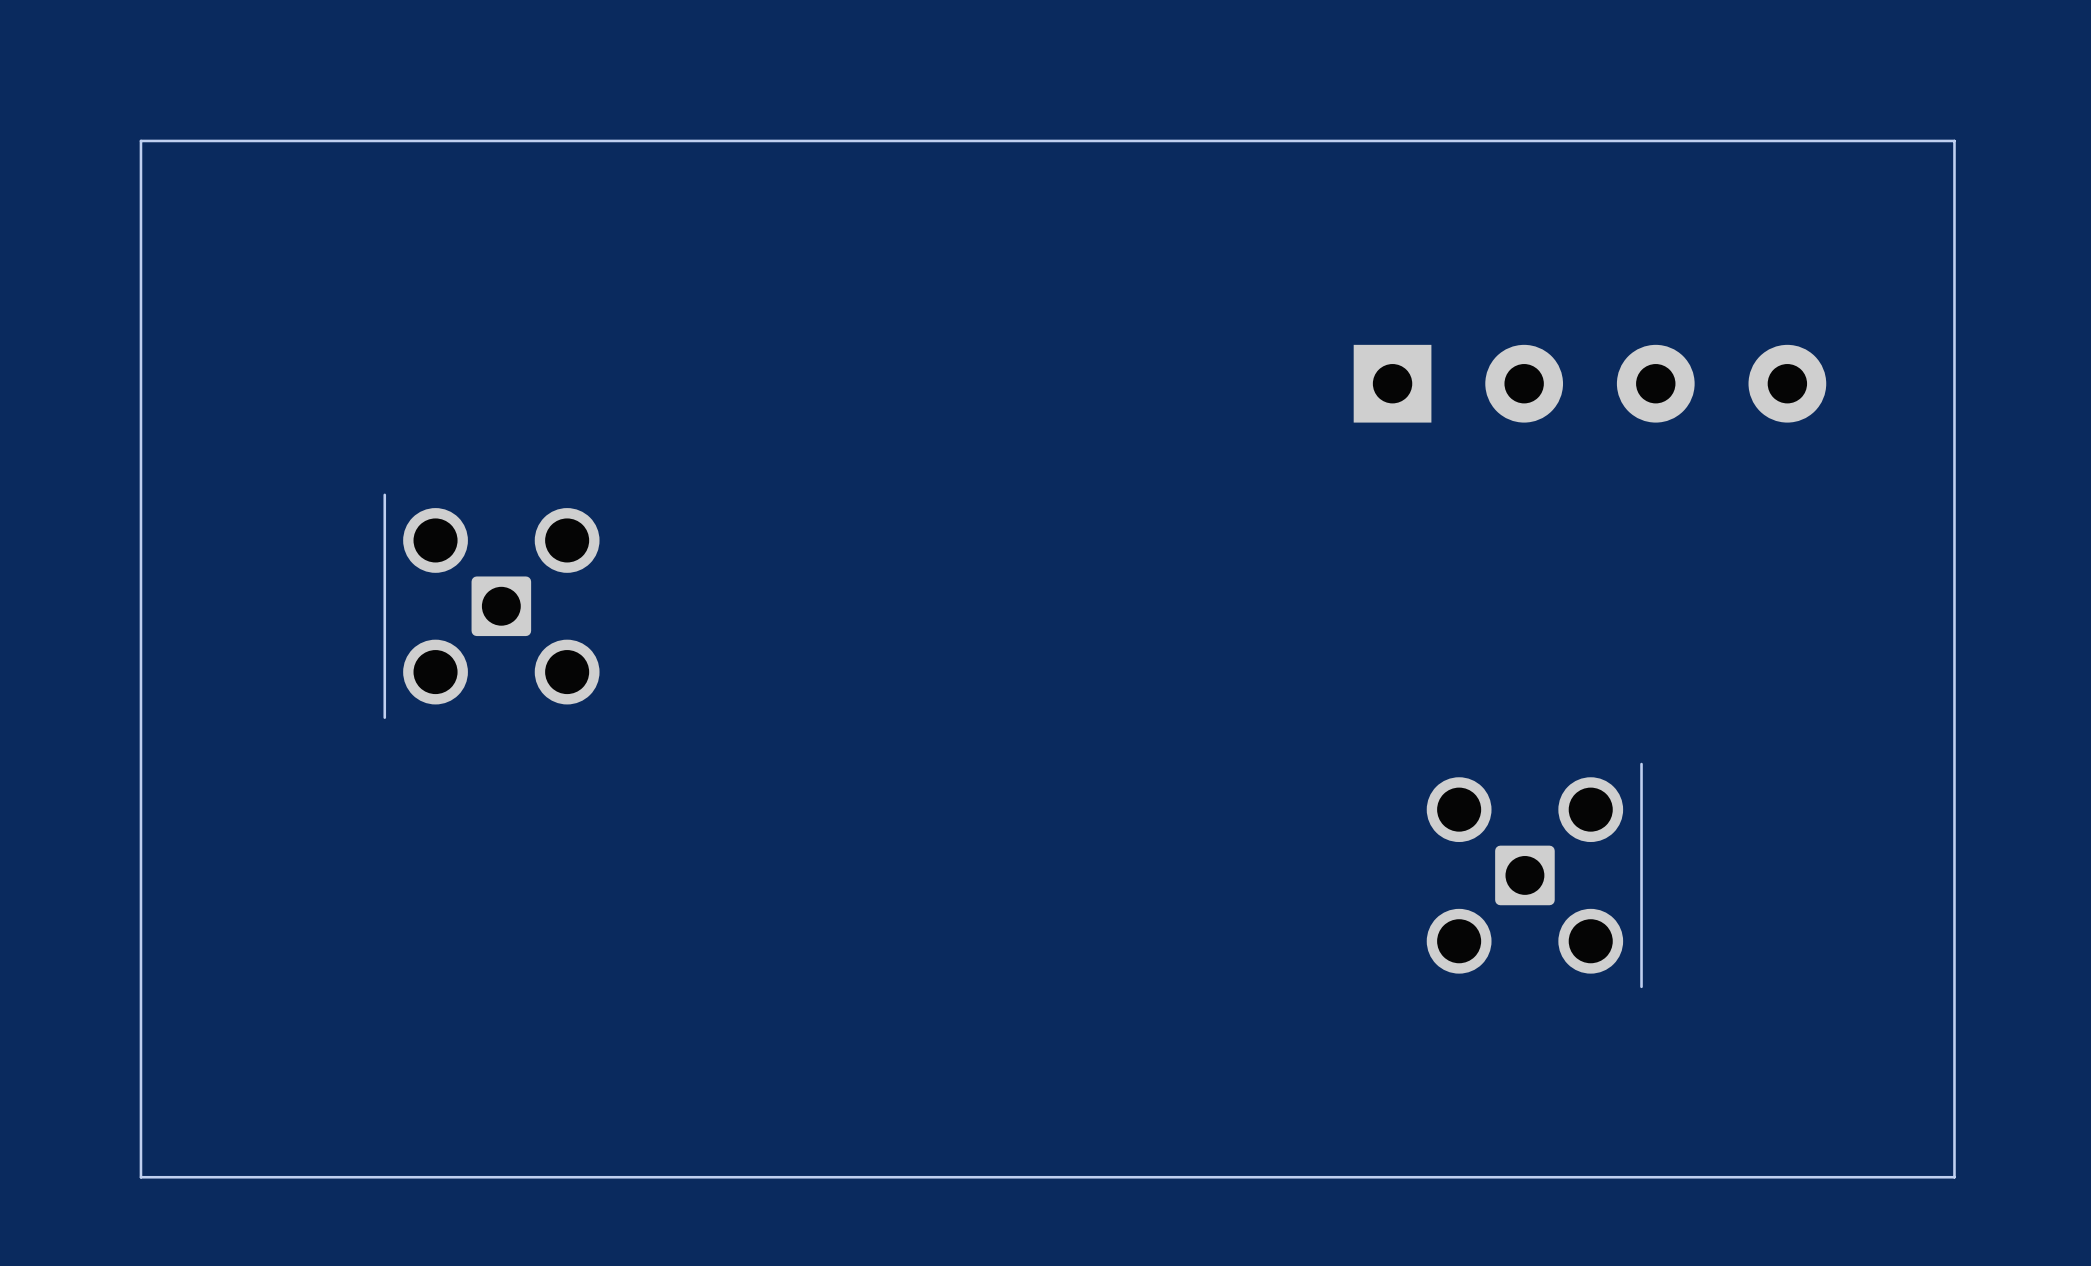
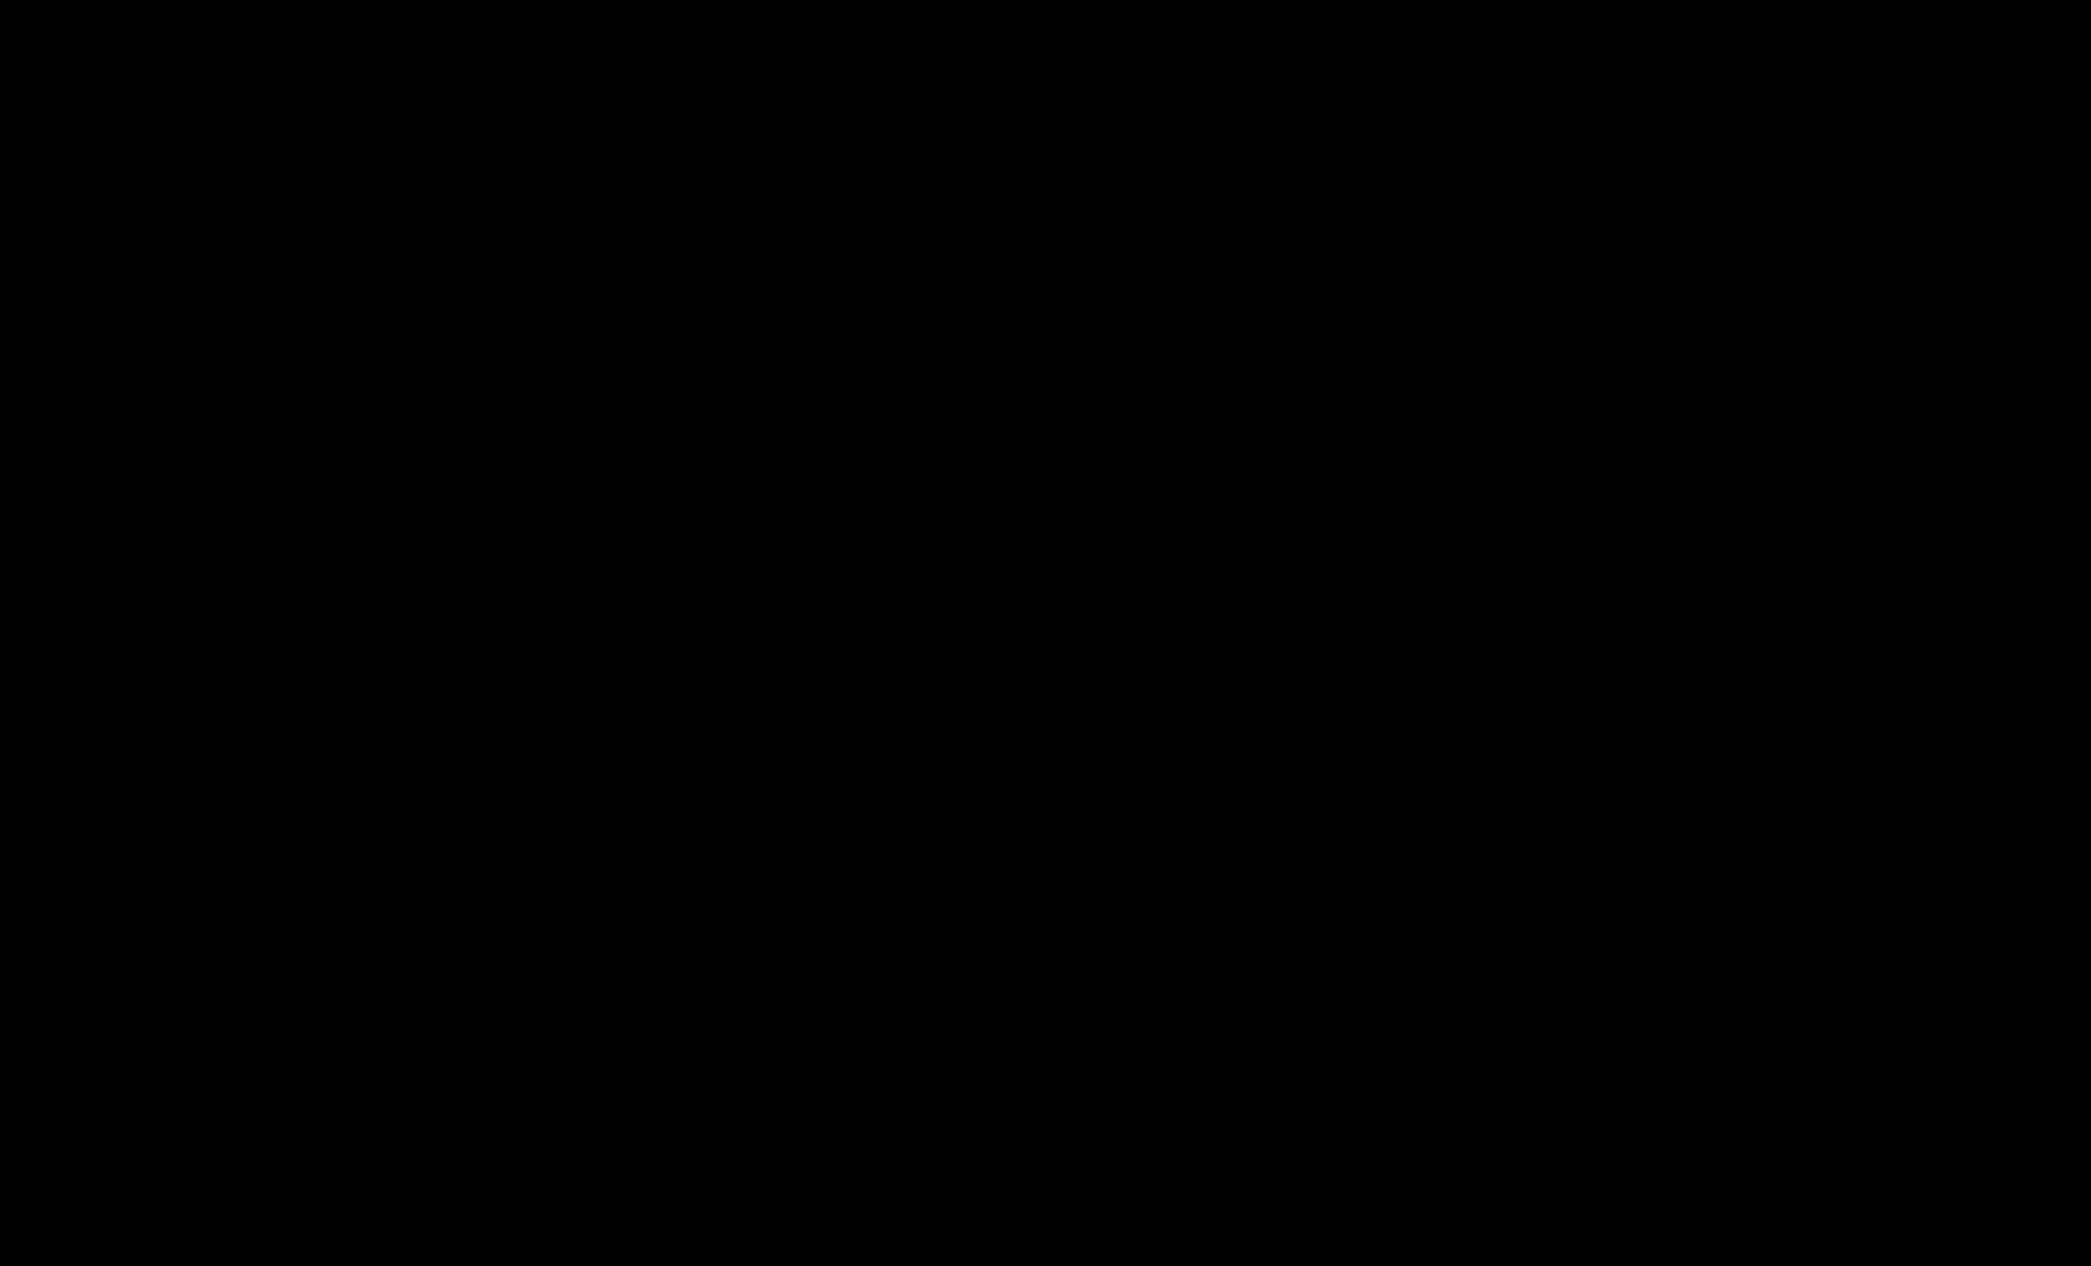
board edge: (1954, 140) (140, 140) (140, 1177) (1954, 1177) (1954, 140) -> none
part: (1589, 383) -> none
part: (491, 606) -> none
part: (1534, 875) -> none

